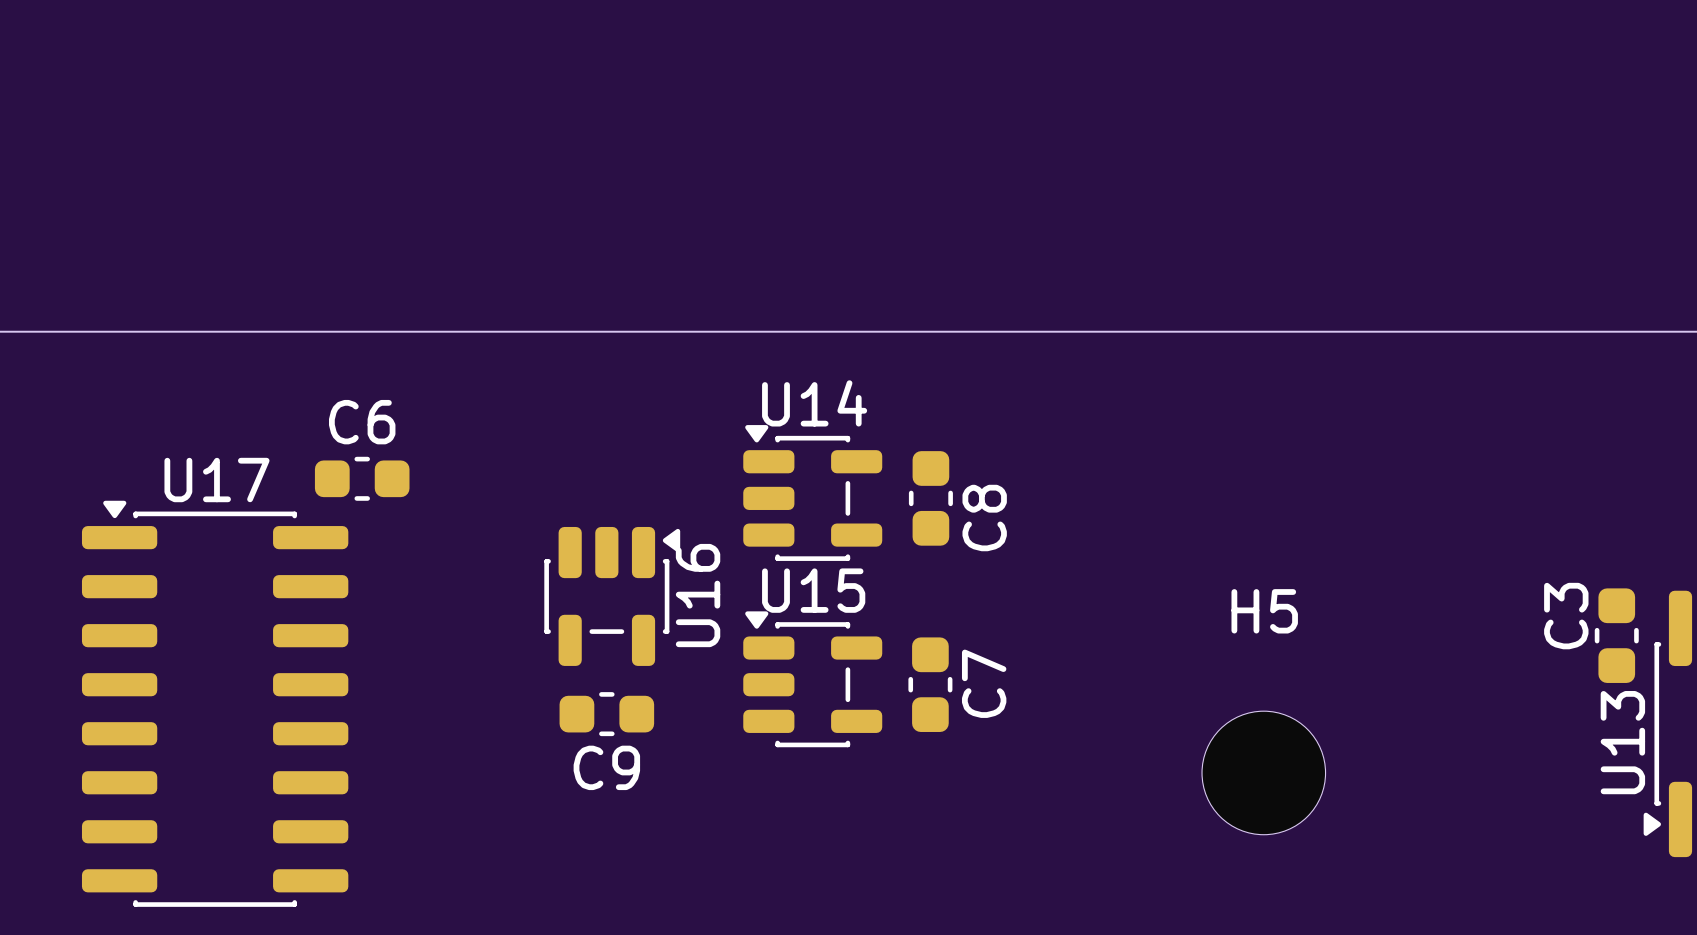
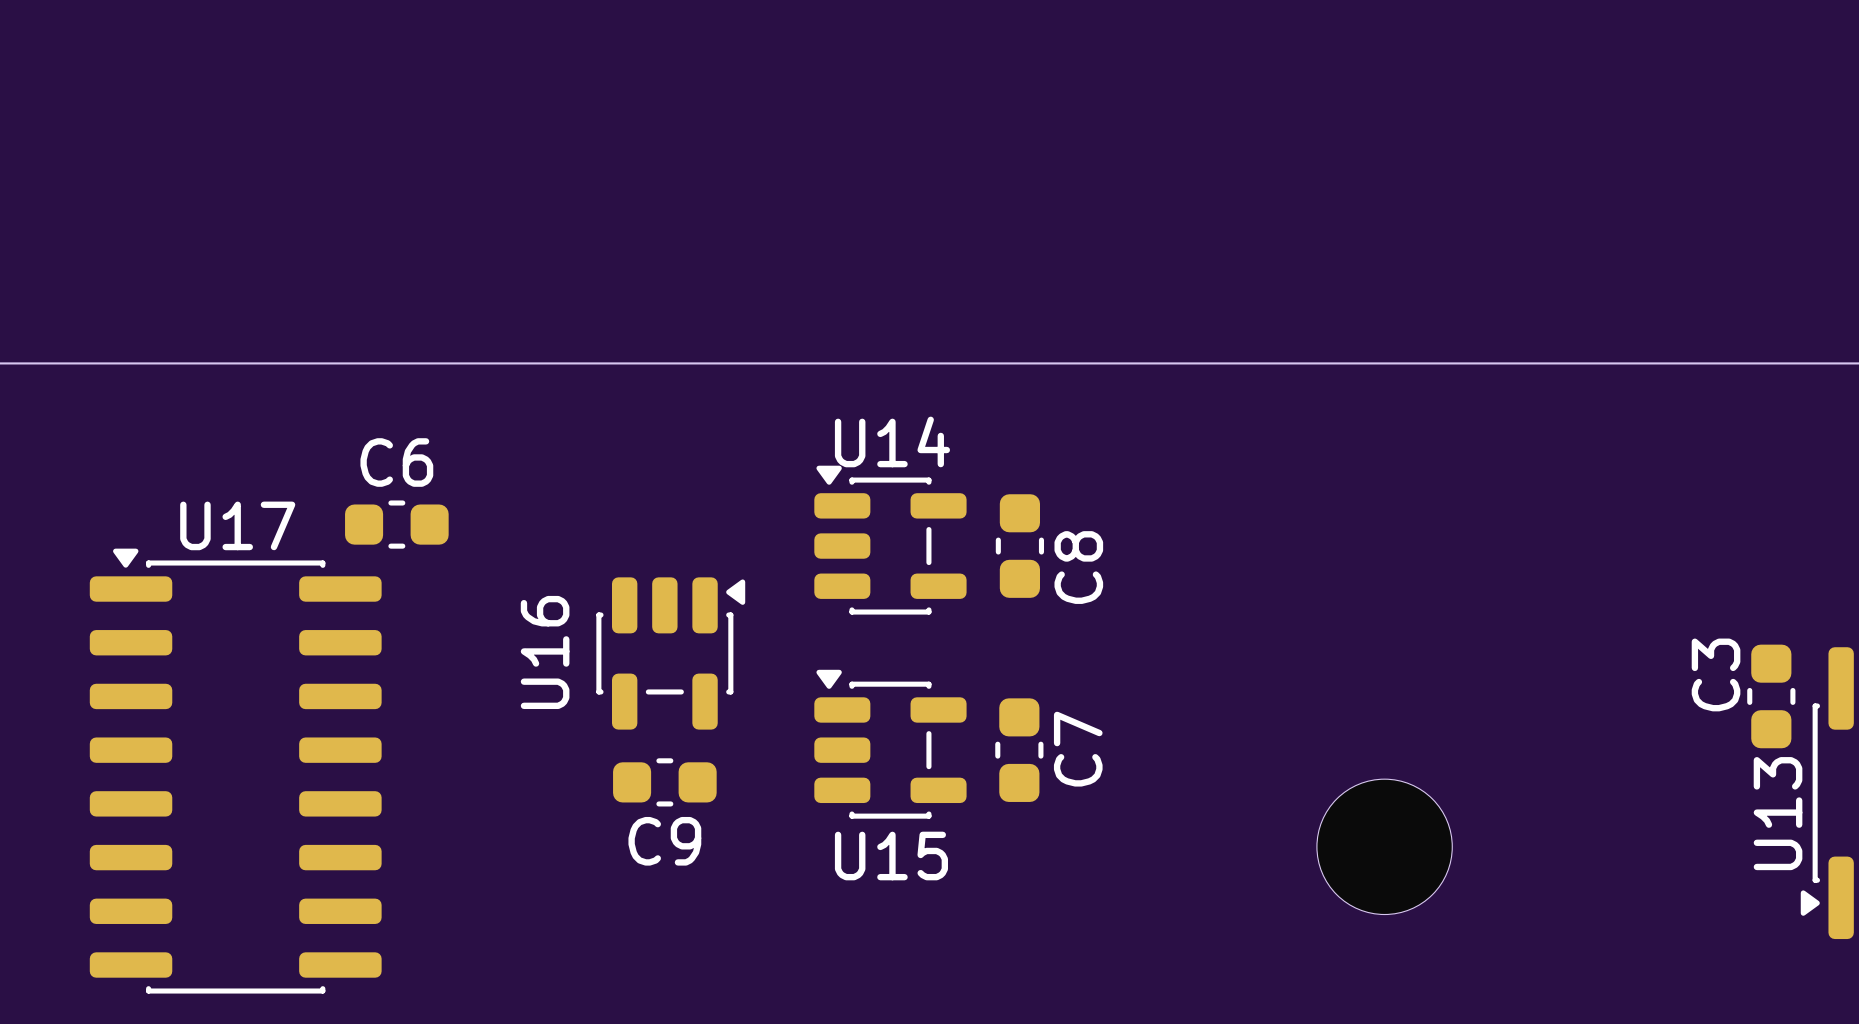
U15 name position: U15 (813, 590) -> U15 (891, 856)
U16 name position: U16 (698, 595) -> U16 (545, 652)
H5 name: H5 (1264, 611) -> none

